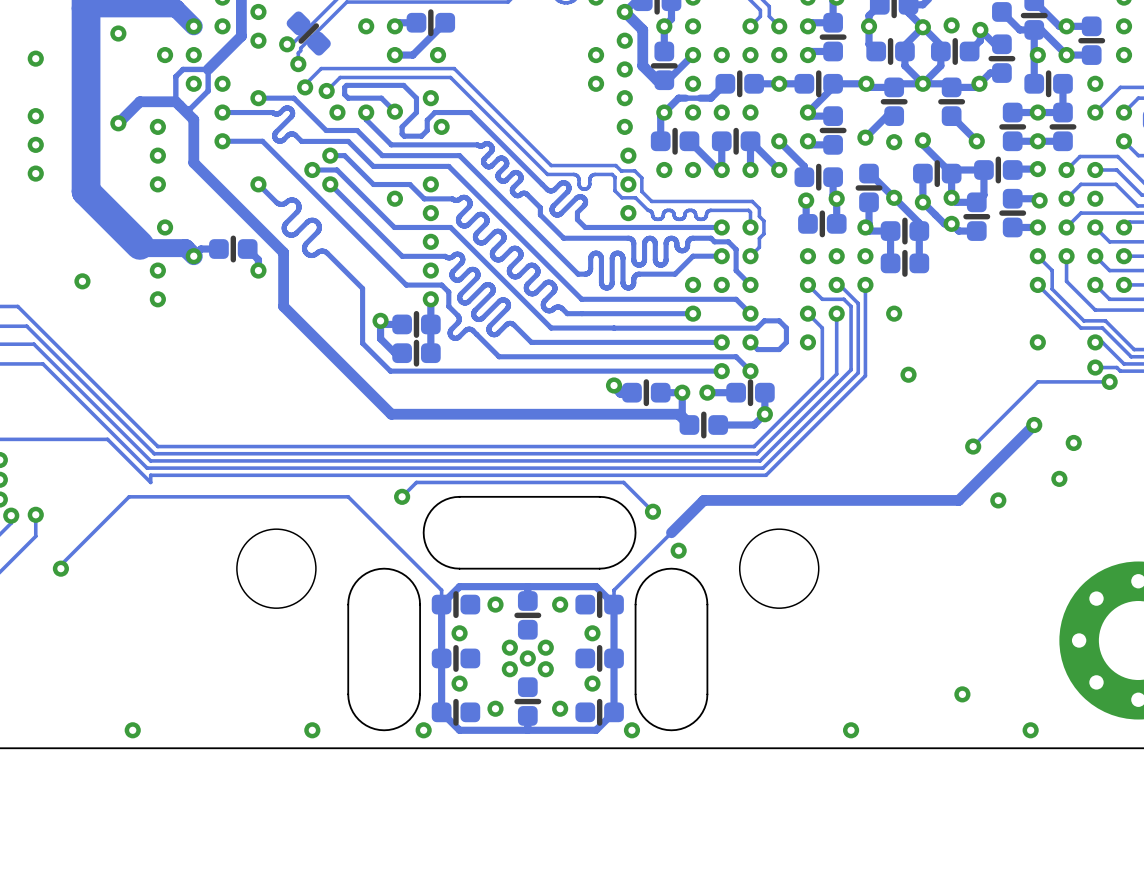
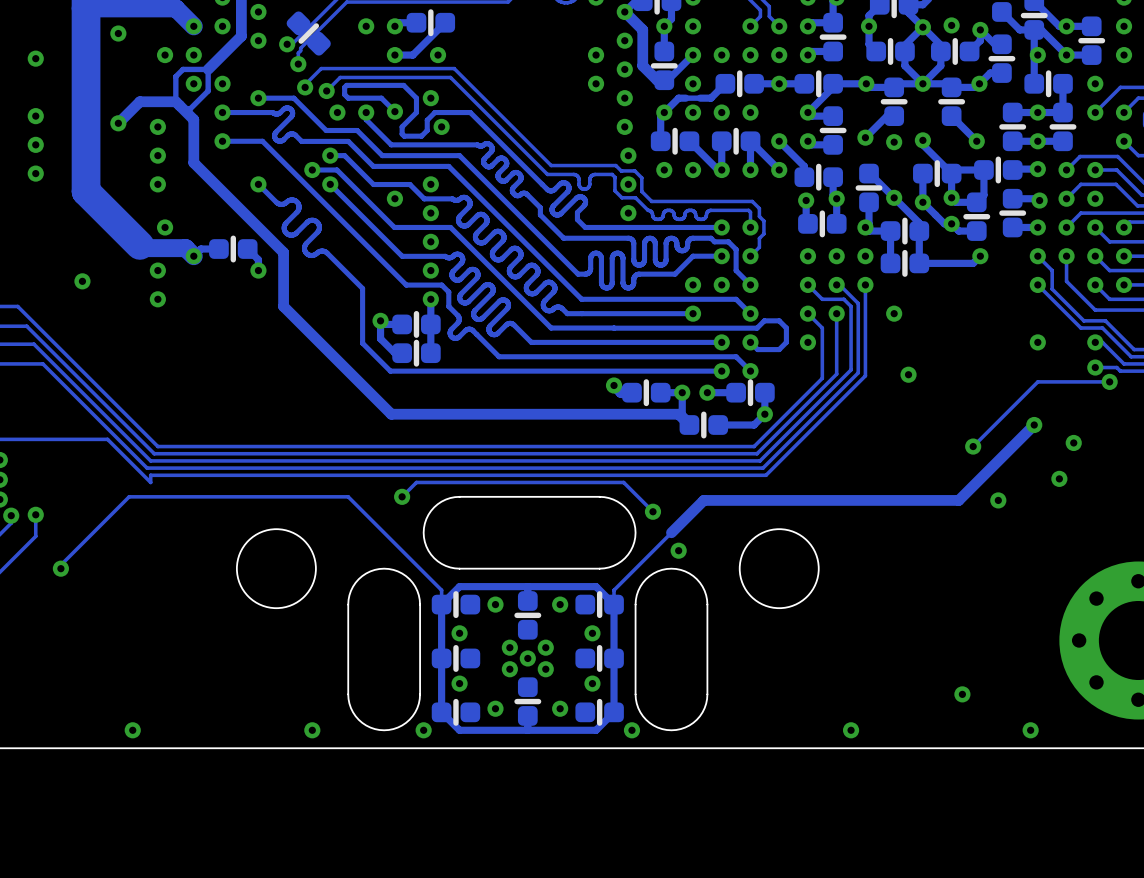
track: none -> (980, 256) (973, 263) (919, 263)
via: none -> (980, 256)

